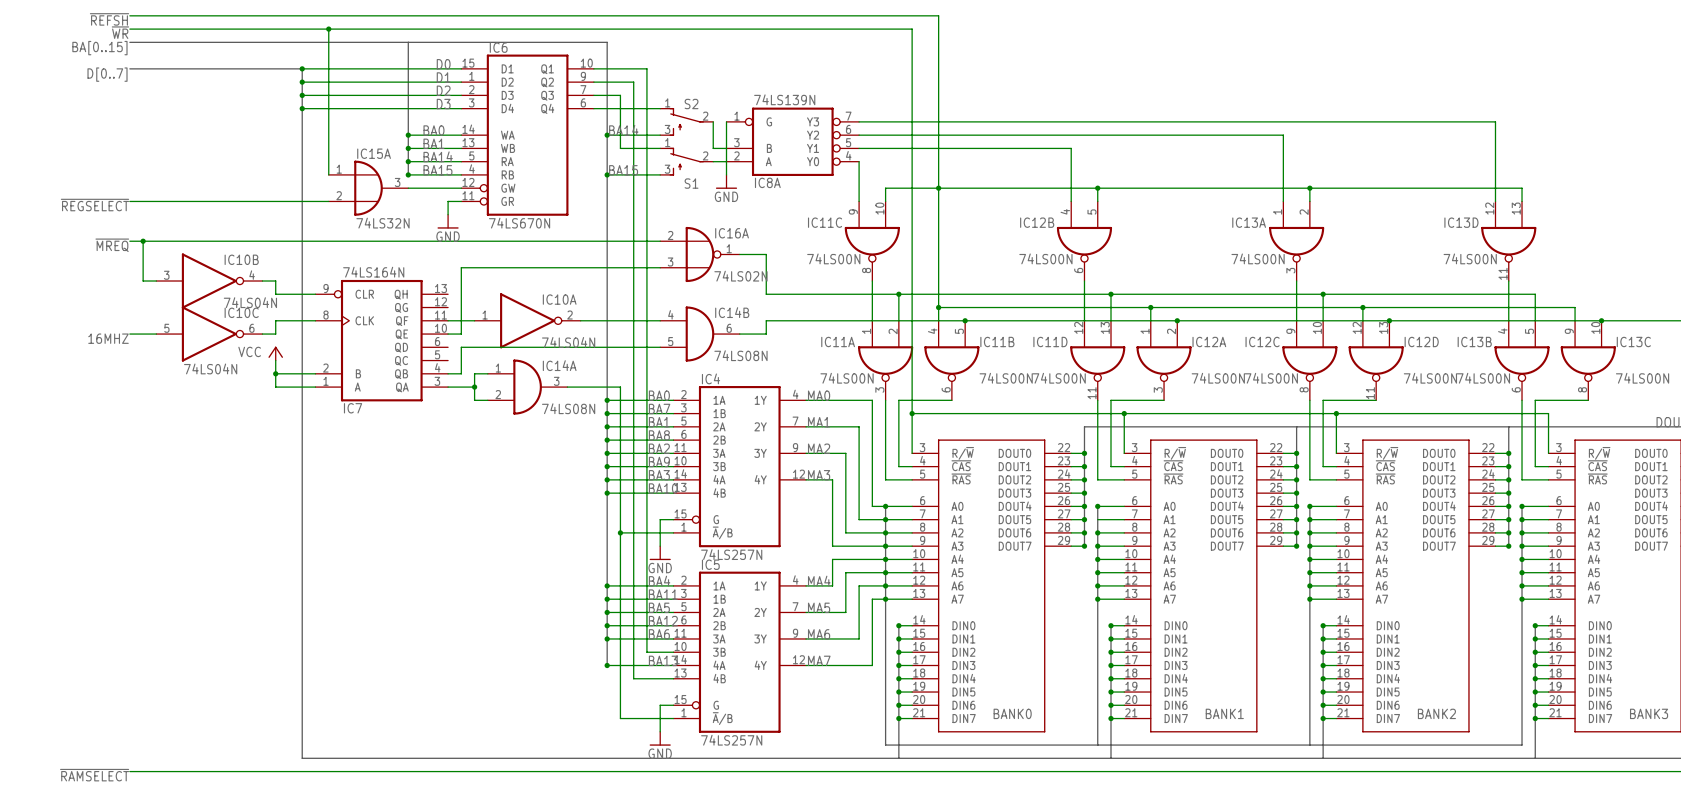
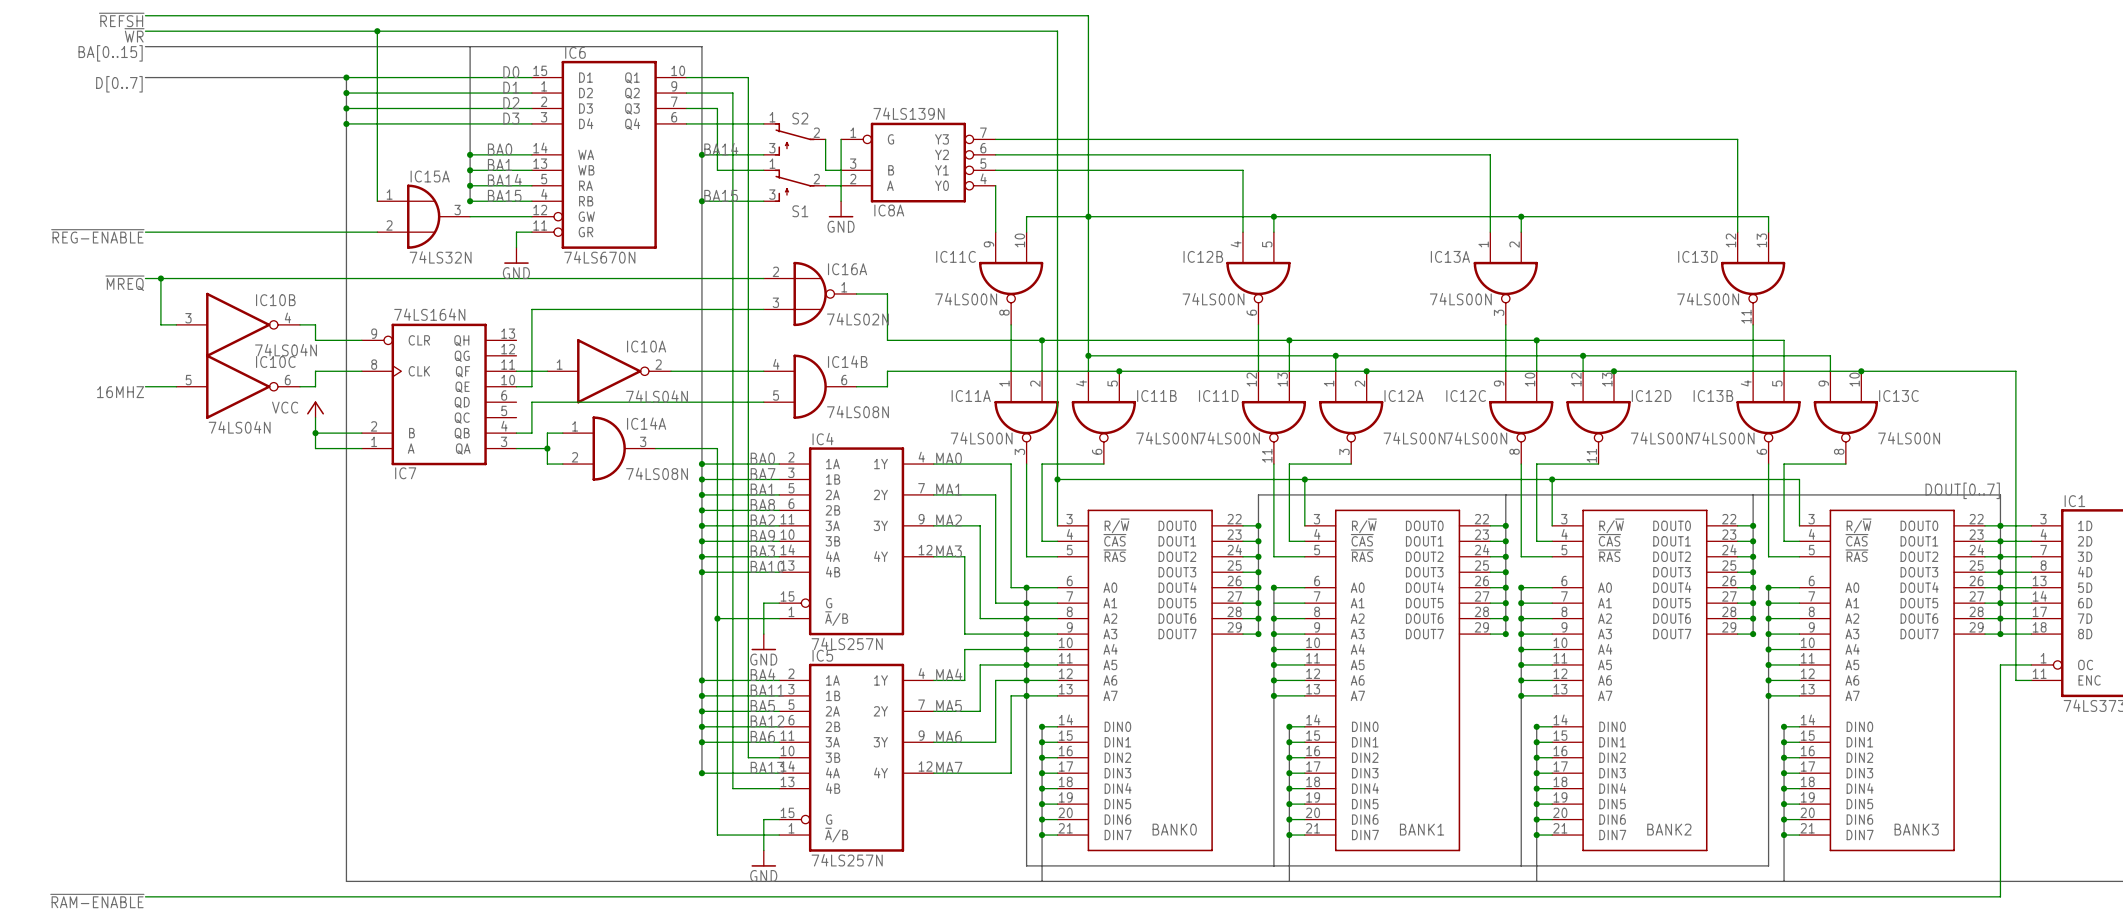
label: ~{REGSELECT} (94, 205) -> ~{REG-ENABLE} (97, 236)
label: ~{RAMSELECT} (94, 775) -> ~{RAM-ENABLE} (97, 901)

